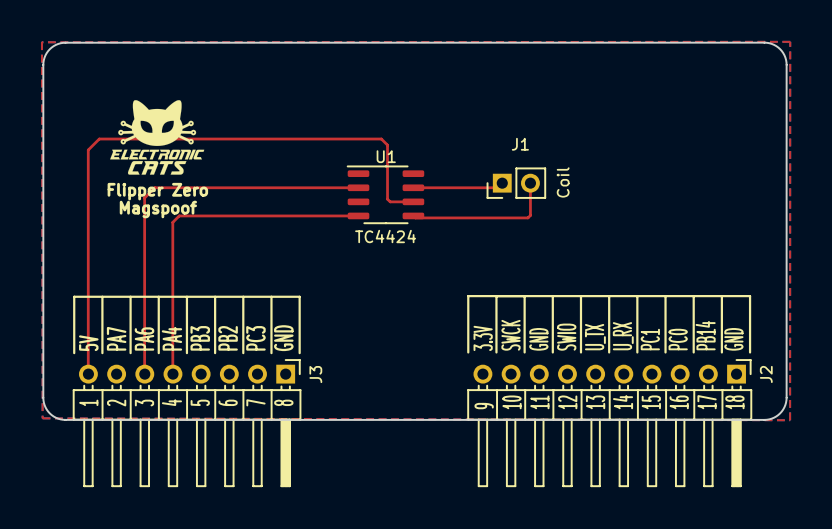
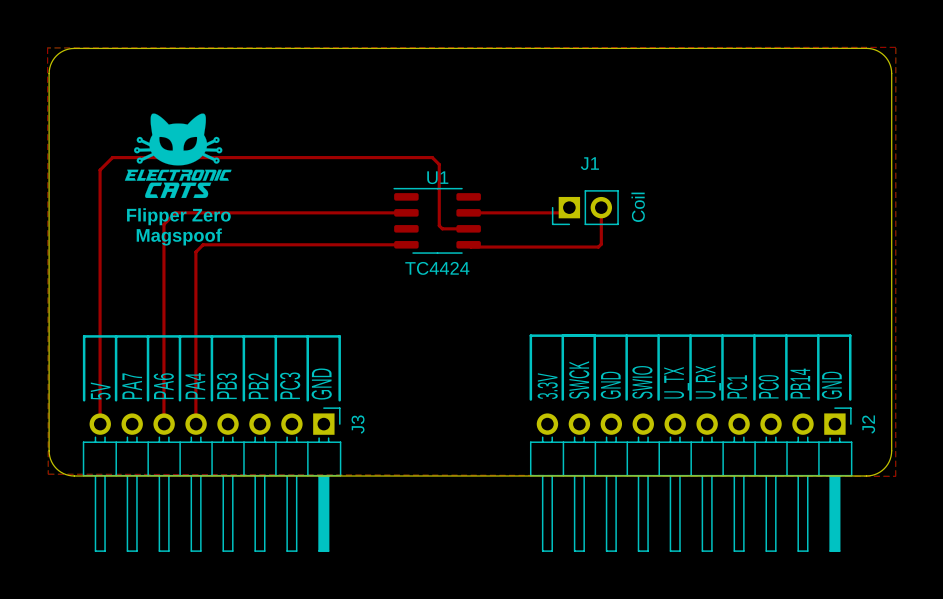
text: 1 (88, 402) -> none
text: 4 (171, 402) -> none
text: 5 (200, 402) -> none
text: 6 (228, 402) -> none
text: 7 (255, 402) -> none
text: 8 (283, 402) -> none
text: 10 (512, 402) -> none
text: 11 (539, 402) -> none
text: 12 (567, 402) -> none
text: 13 (595, 402) -> none
text: 14 (623, 402) -> none
text: 15 (651, 402) -> none
text: 16 (679, 402) -> none
text: 17 (707, 402) -> none
text: 18 (734, 402) -> none
text: 2 (116, 403) -> none
text: 3 (144, 403) -> none
text: 9 (484, 406) -> none

